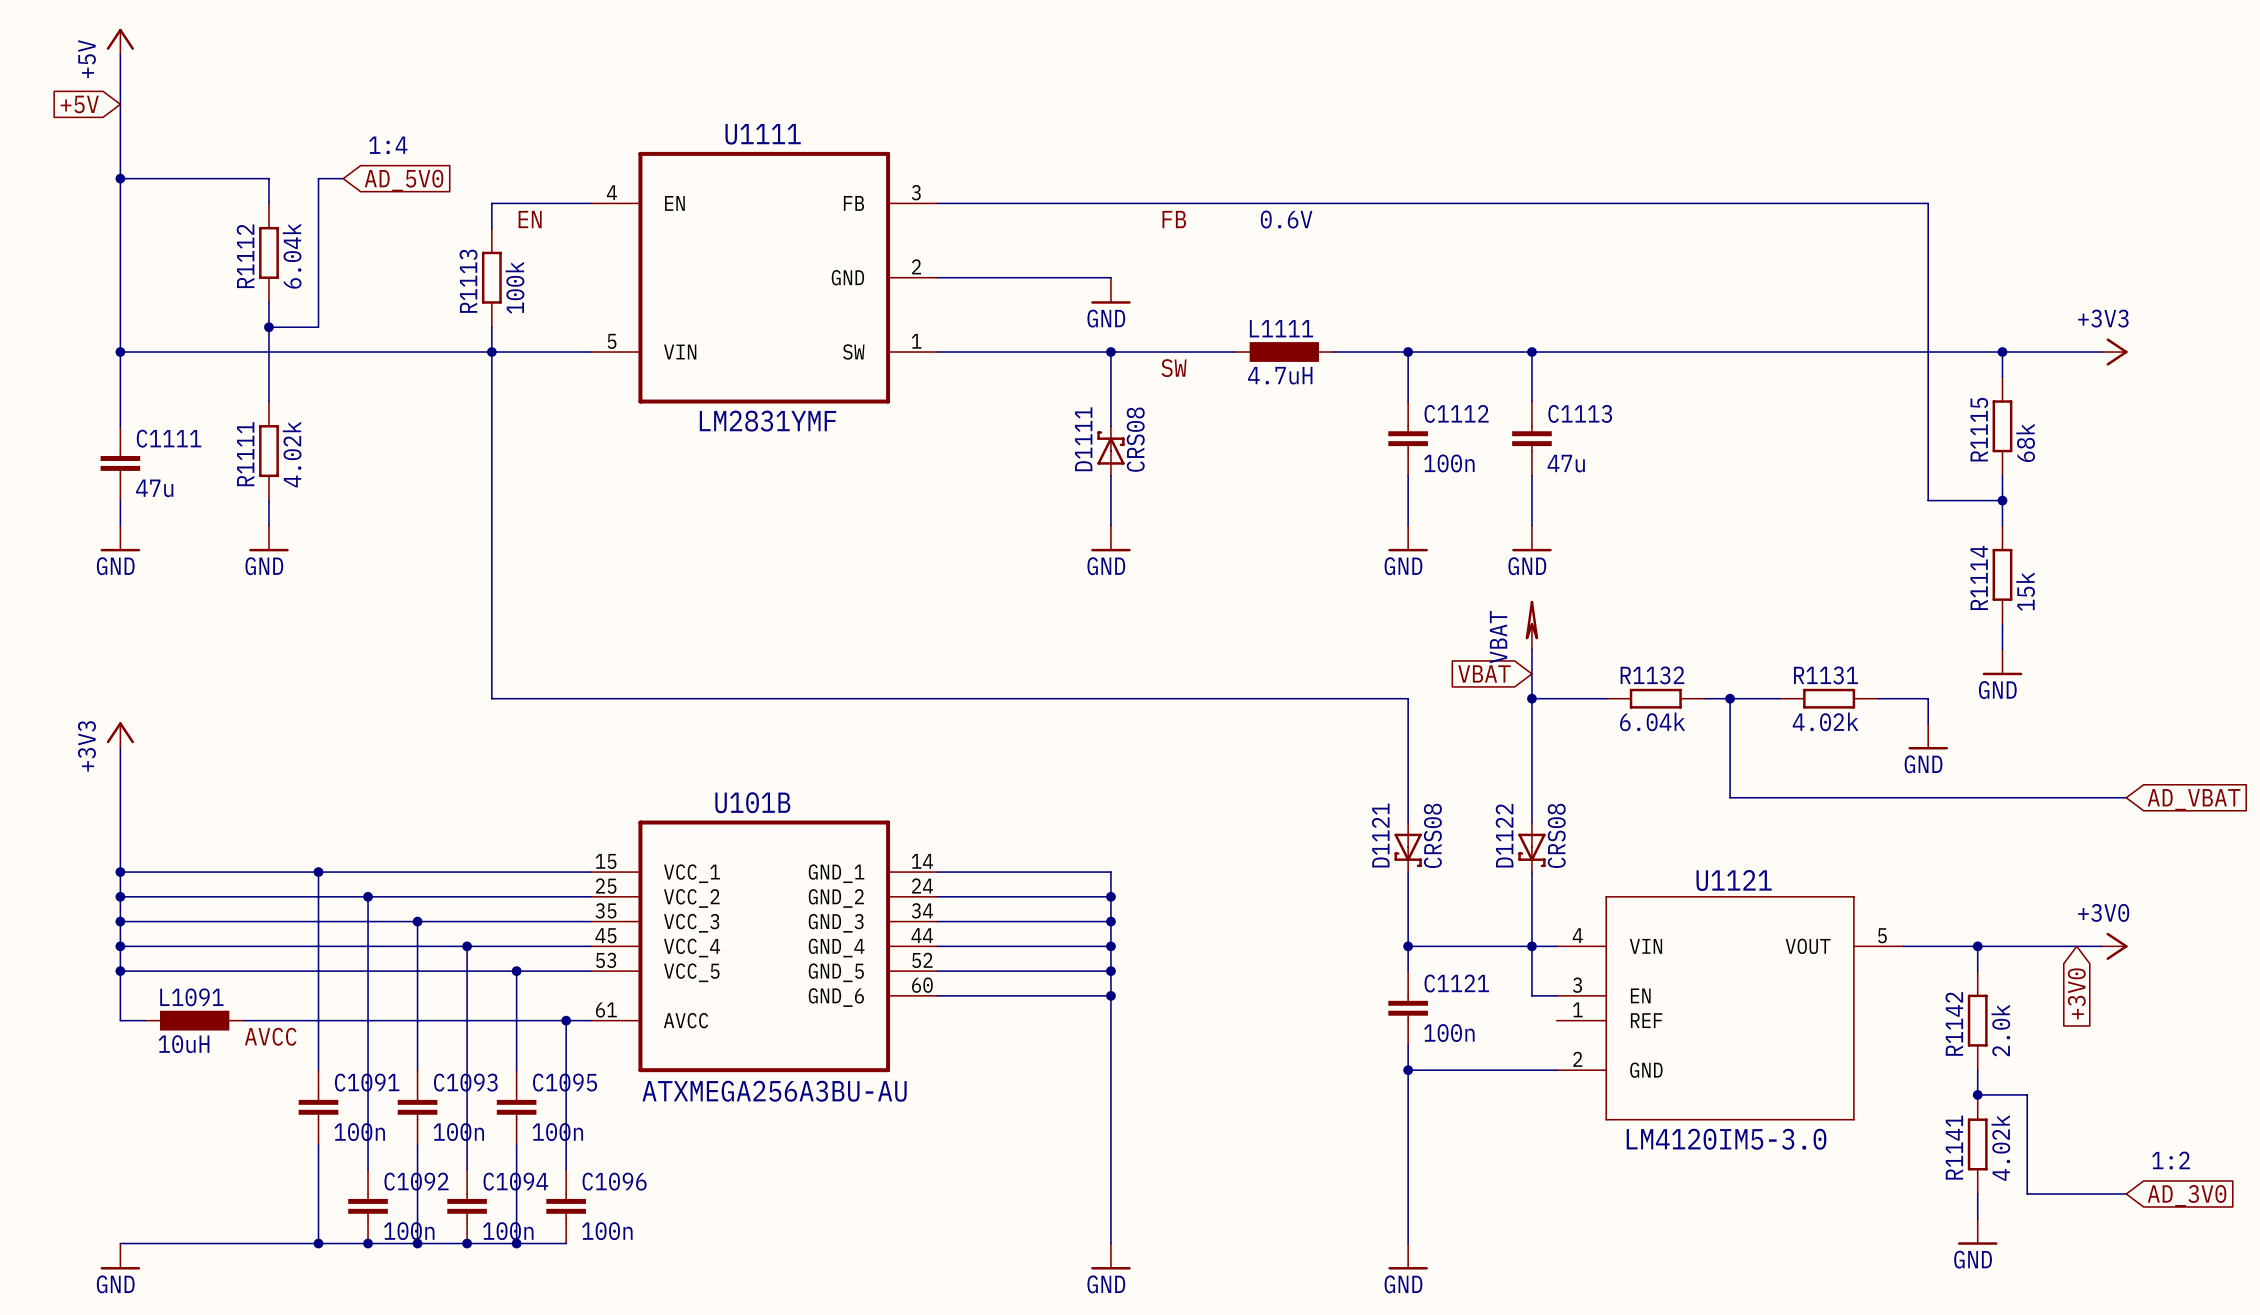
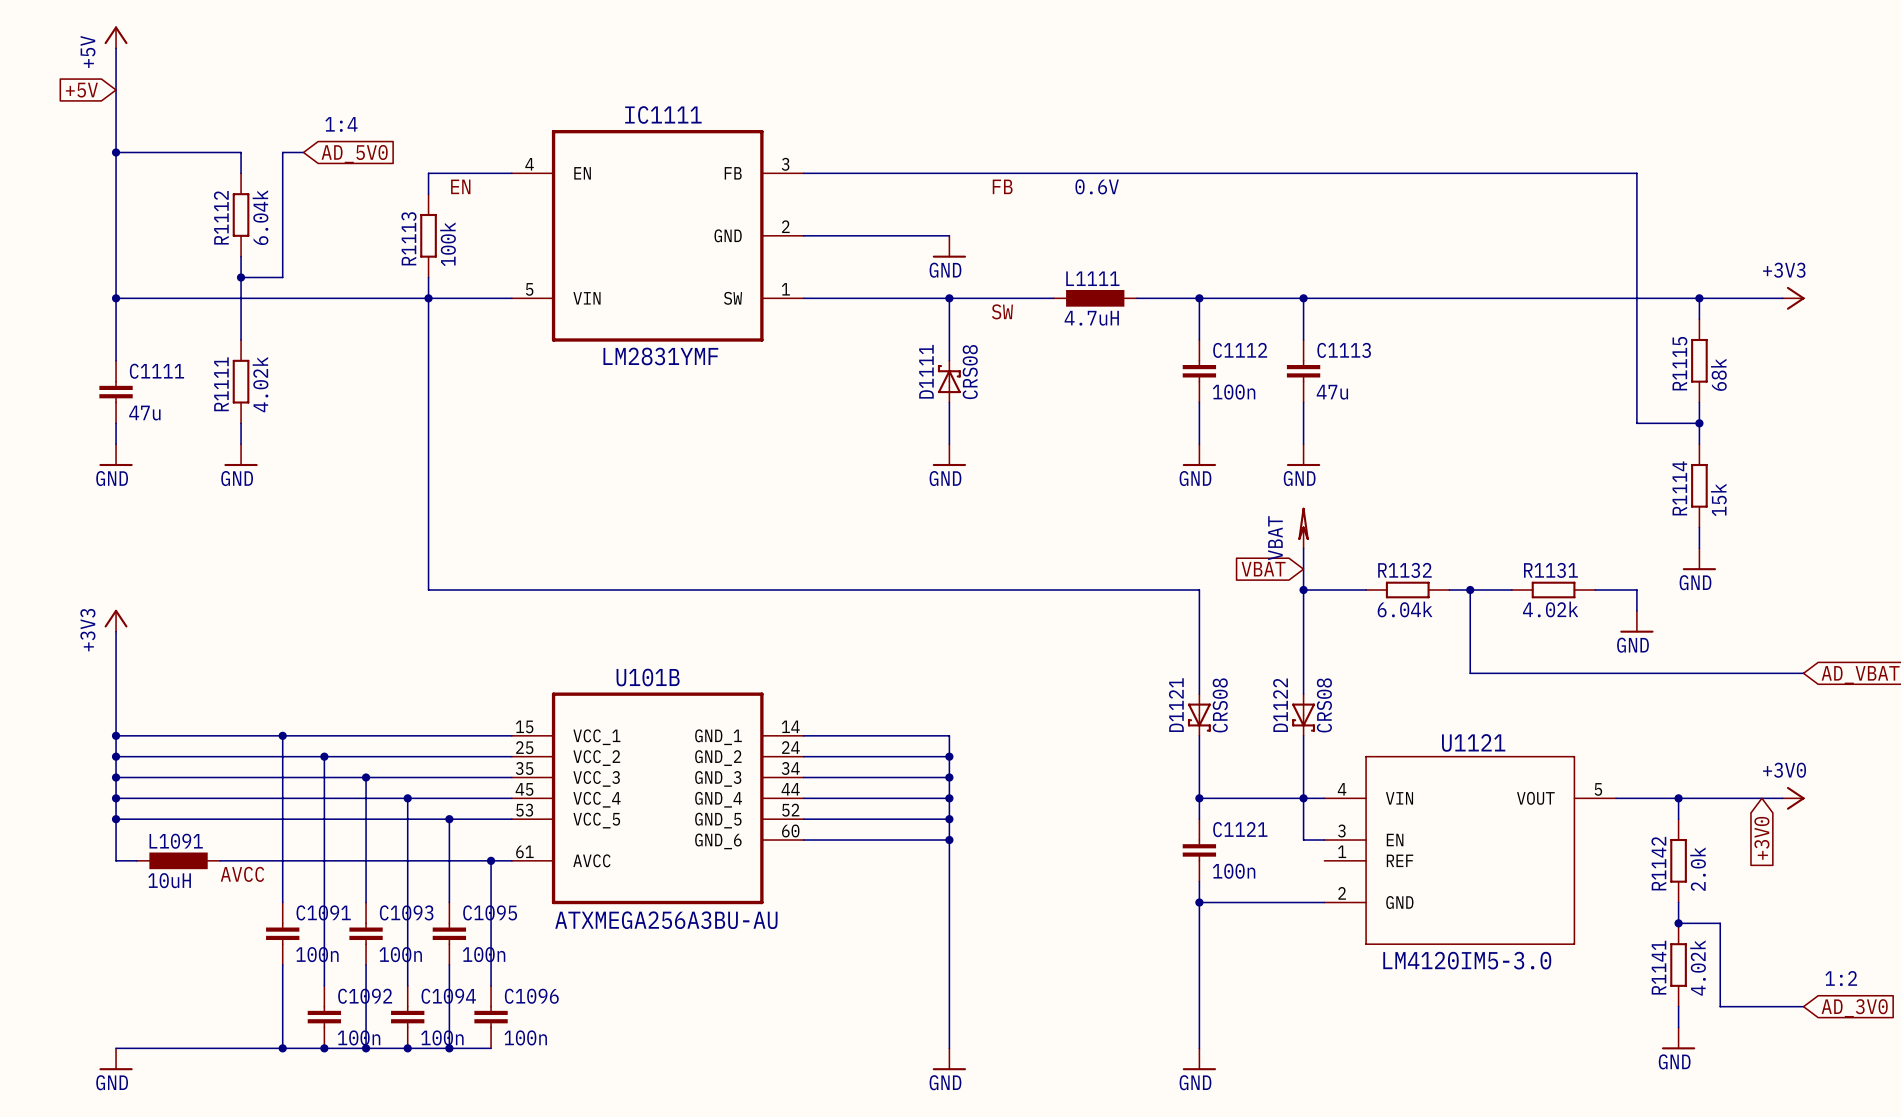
U1111 name: U1111 (763, 134) -> IC1111 (663, 114)

